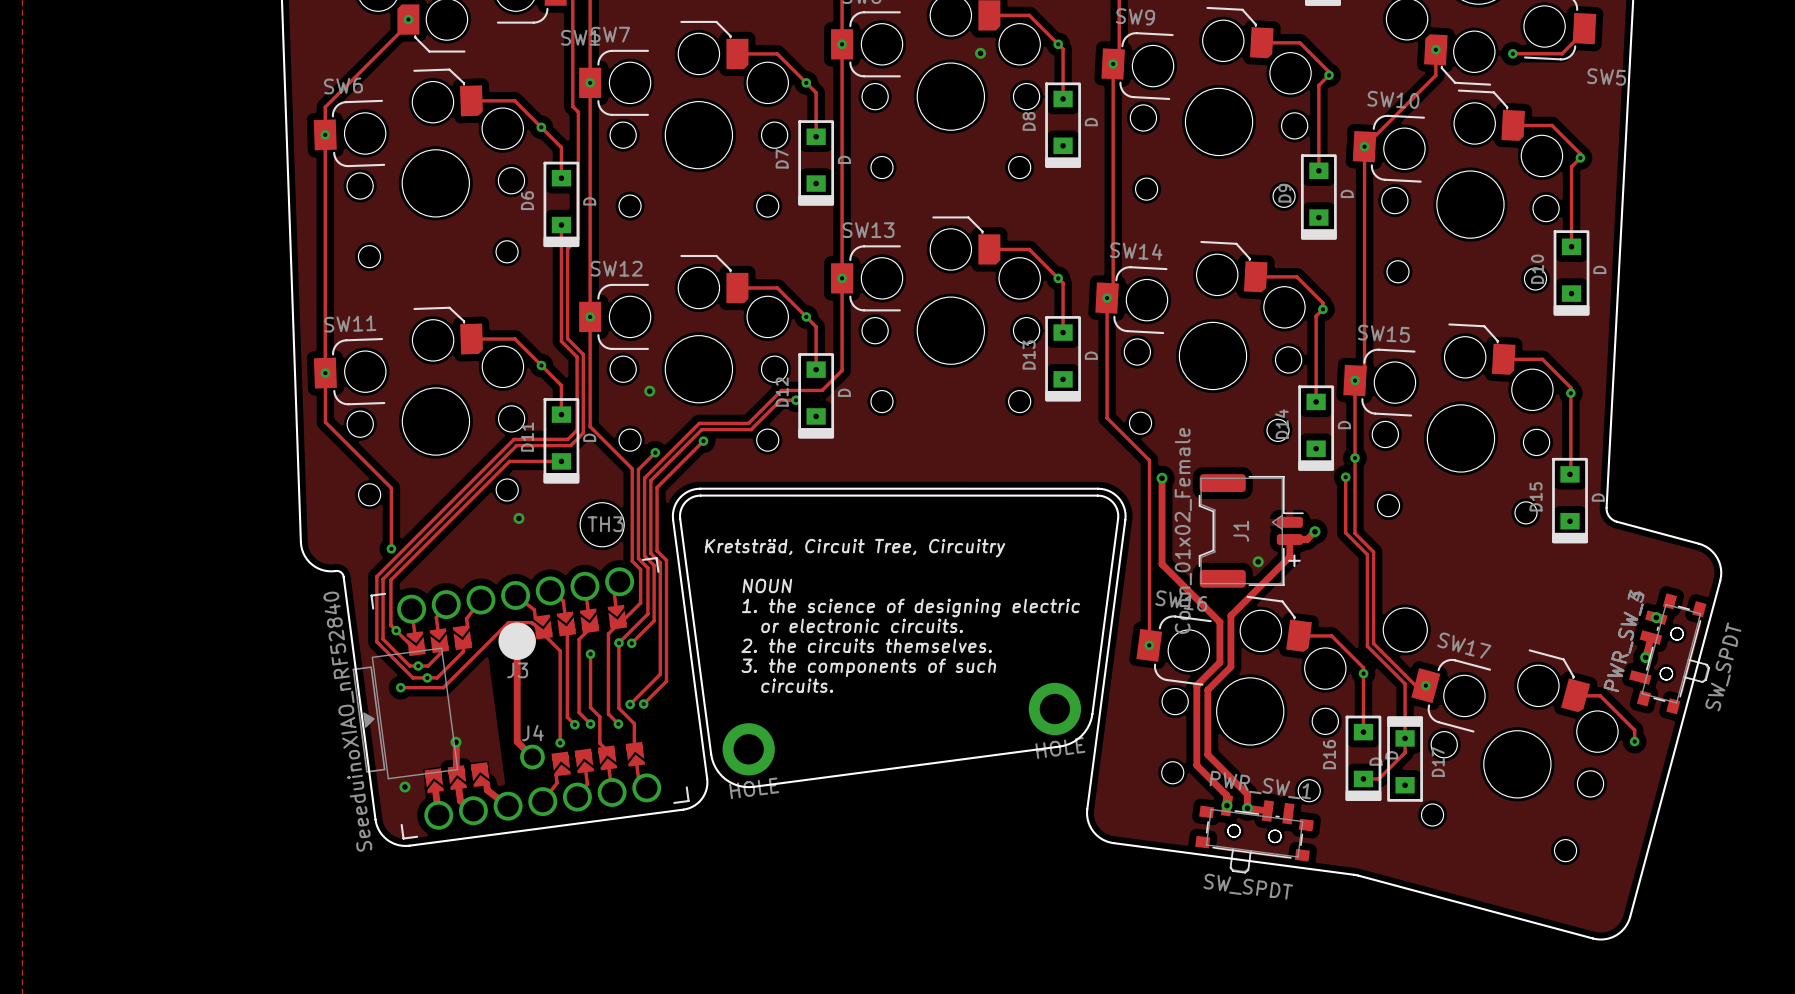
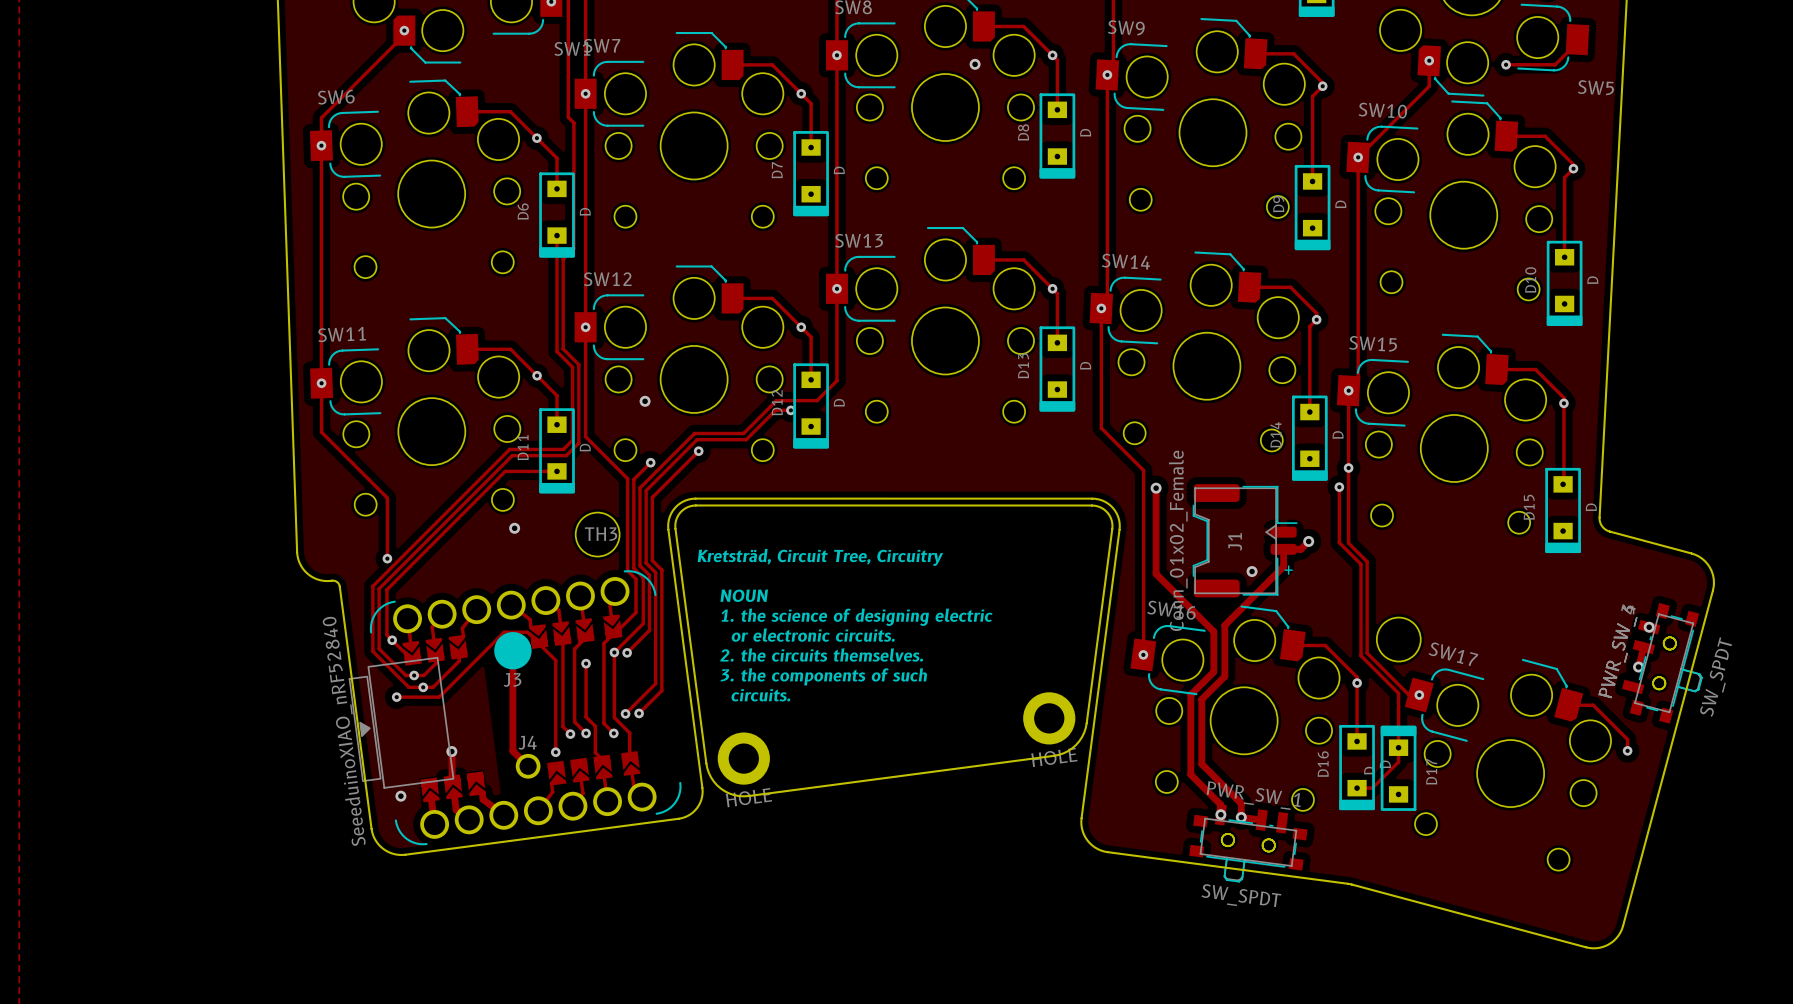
part footprint: [352, 557, 690, 840] -> [348, 570, 682, 846]

